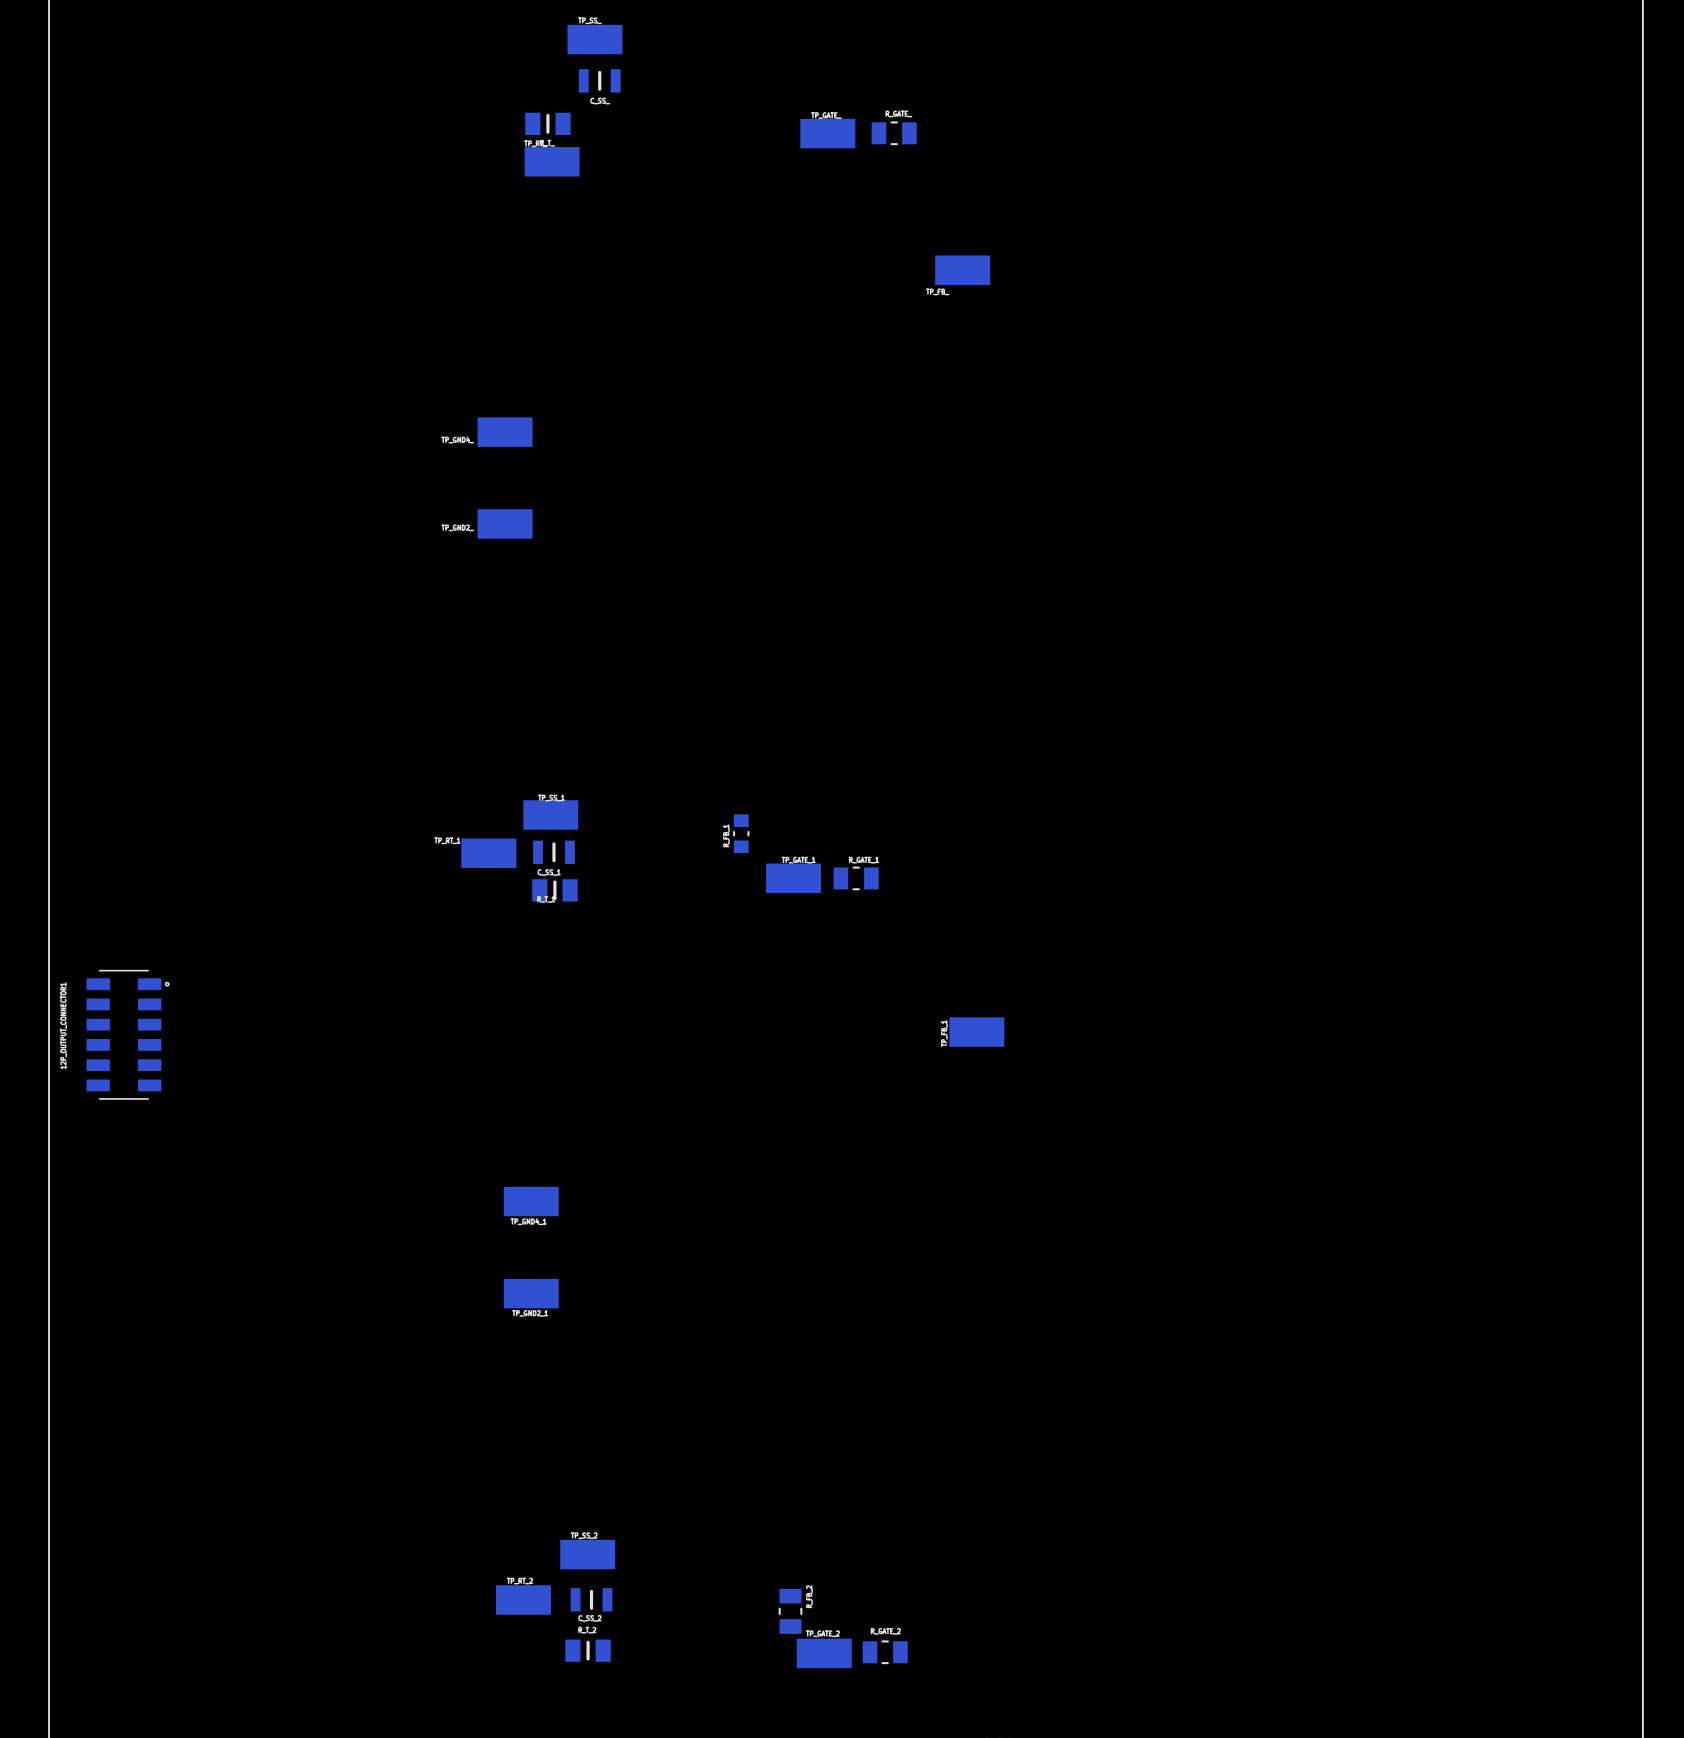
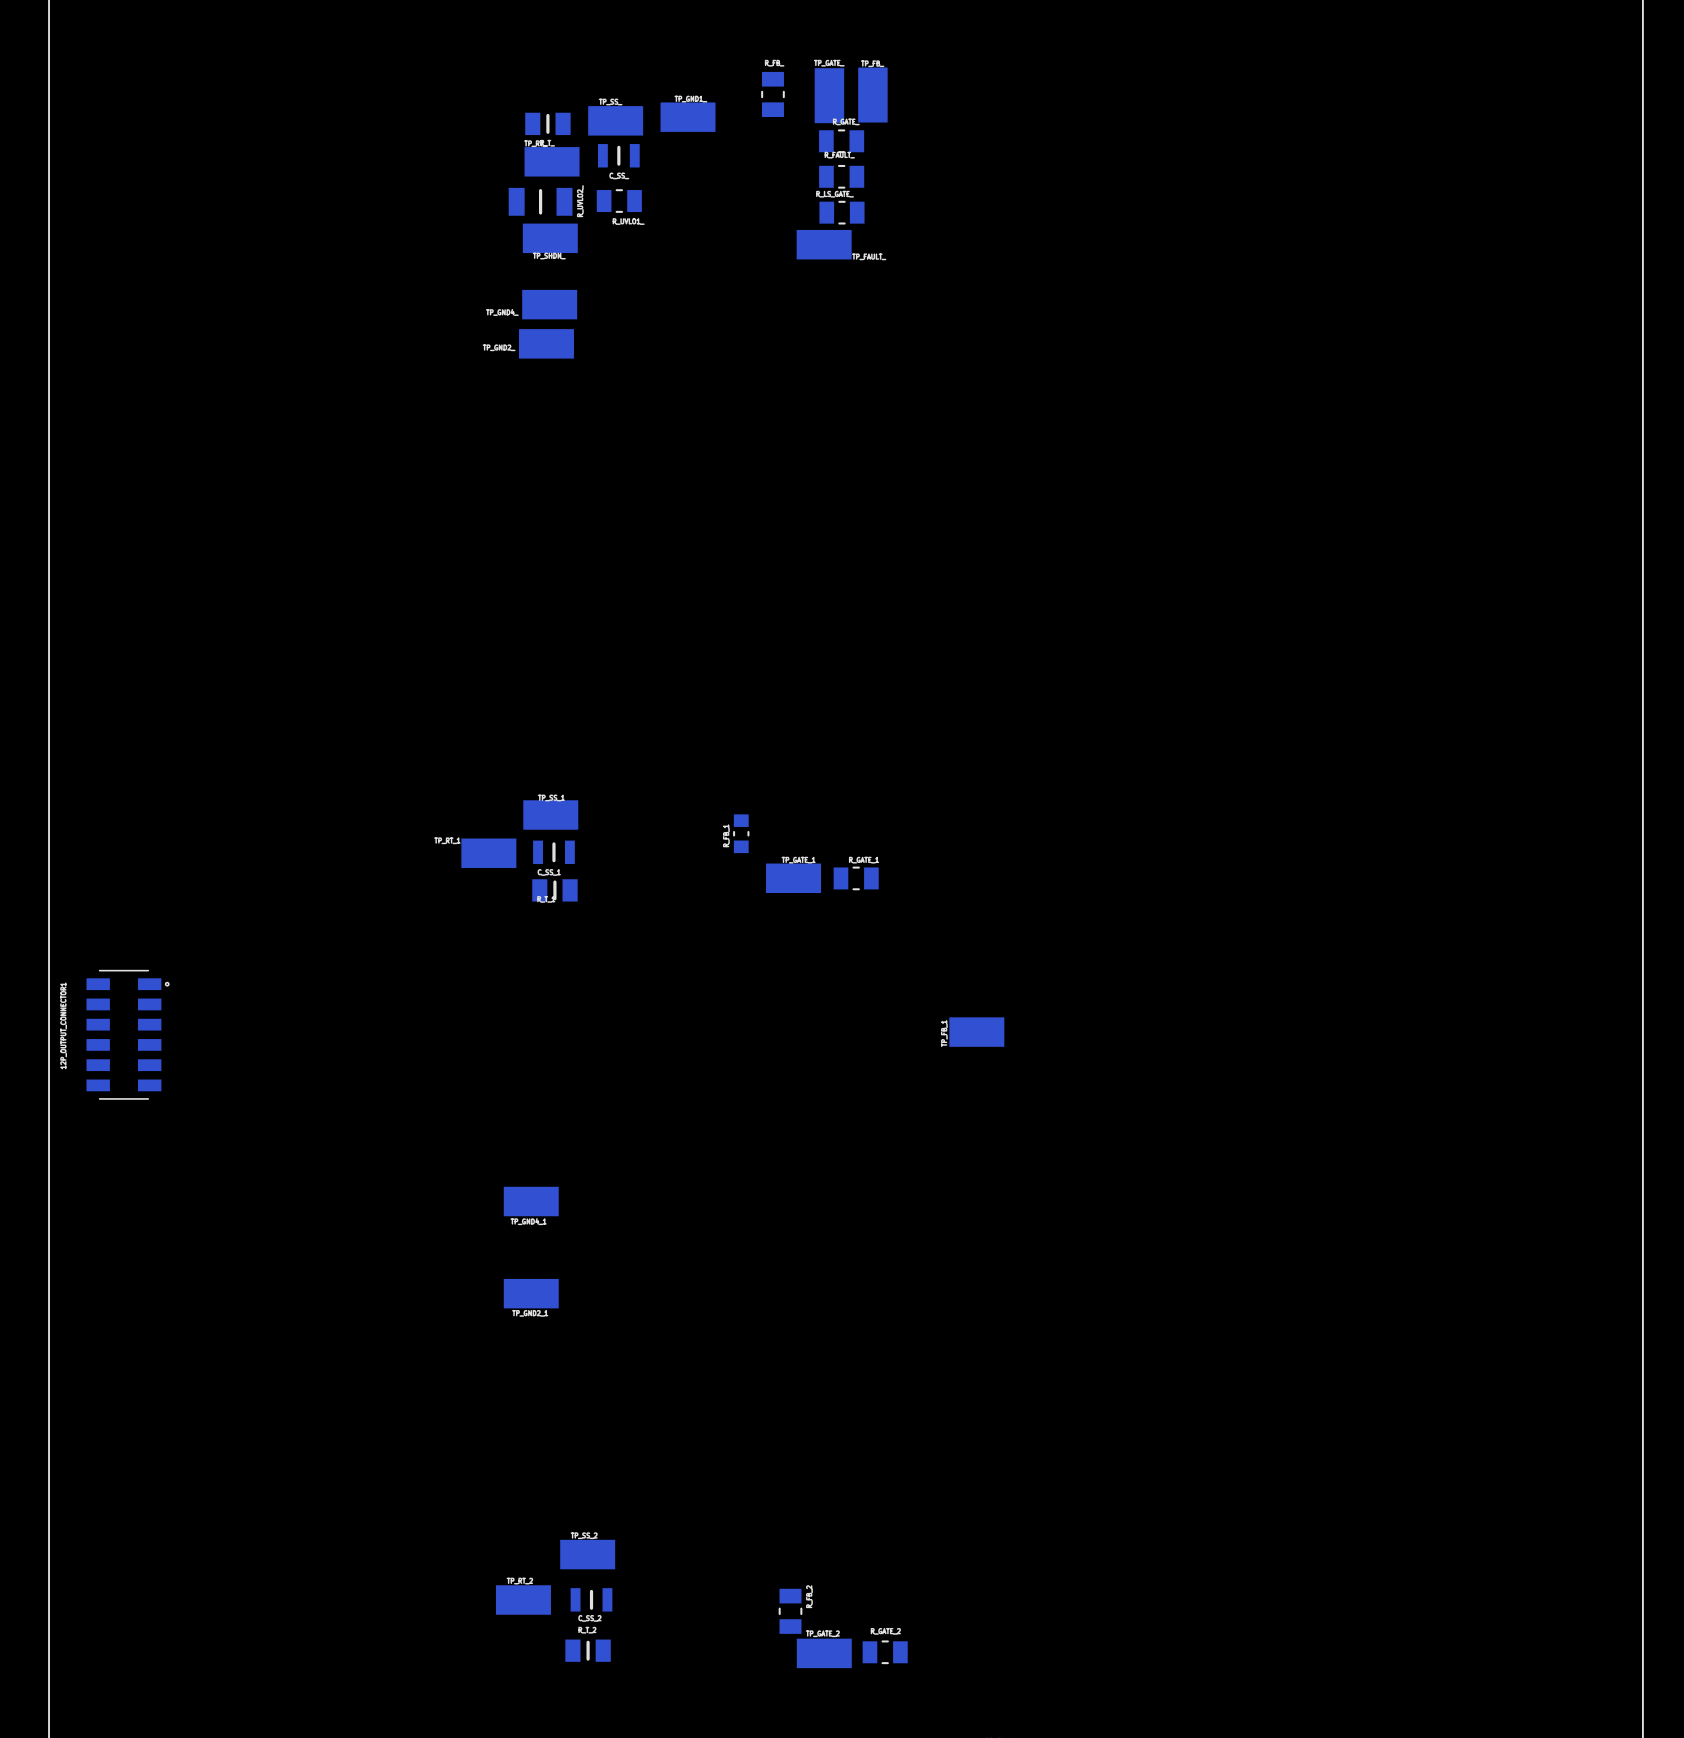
part position: (594, 39) -> (615, 120)
part position: (599, 80) -> (618, 155)
part: none -> (772, 94)
part: none -> (688, 117)
part rotation: 0° (827, 133) -> 90° clockwise (829, 95)
part position: (827, 133) -> (829, 95)
part position: (894, 133) -> (841, 141)
part: none -> (841, 176)
part: none -> (540, 201)
part: none -> (619, 201)
part: none -> (841, 212)
part: none -> (550, 238)
part: none -> (824, 244)
part rotation: 0° (962, 270) -> 90° clockwise (872, 95)
part position: (962, 270) -> (872, 95)
part position: (505, 432) -> (549, 304)
part position: (505, 523) -> (546, 343)

